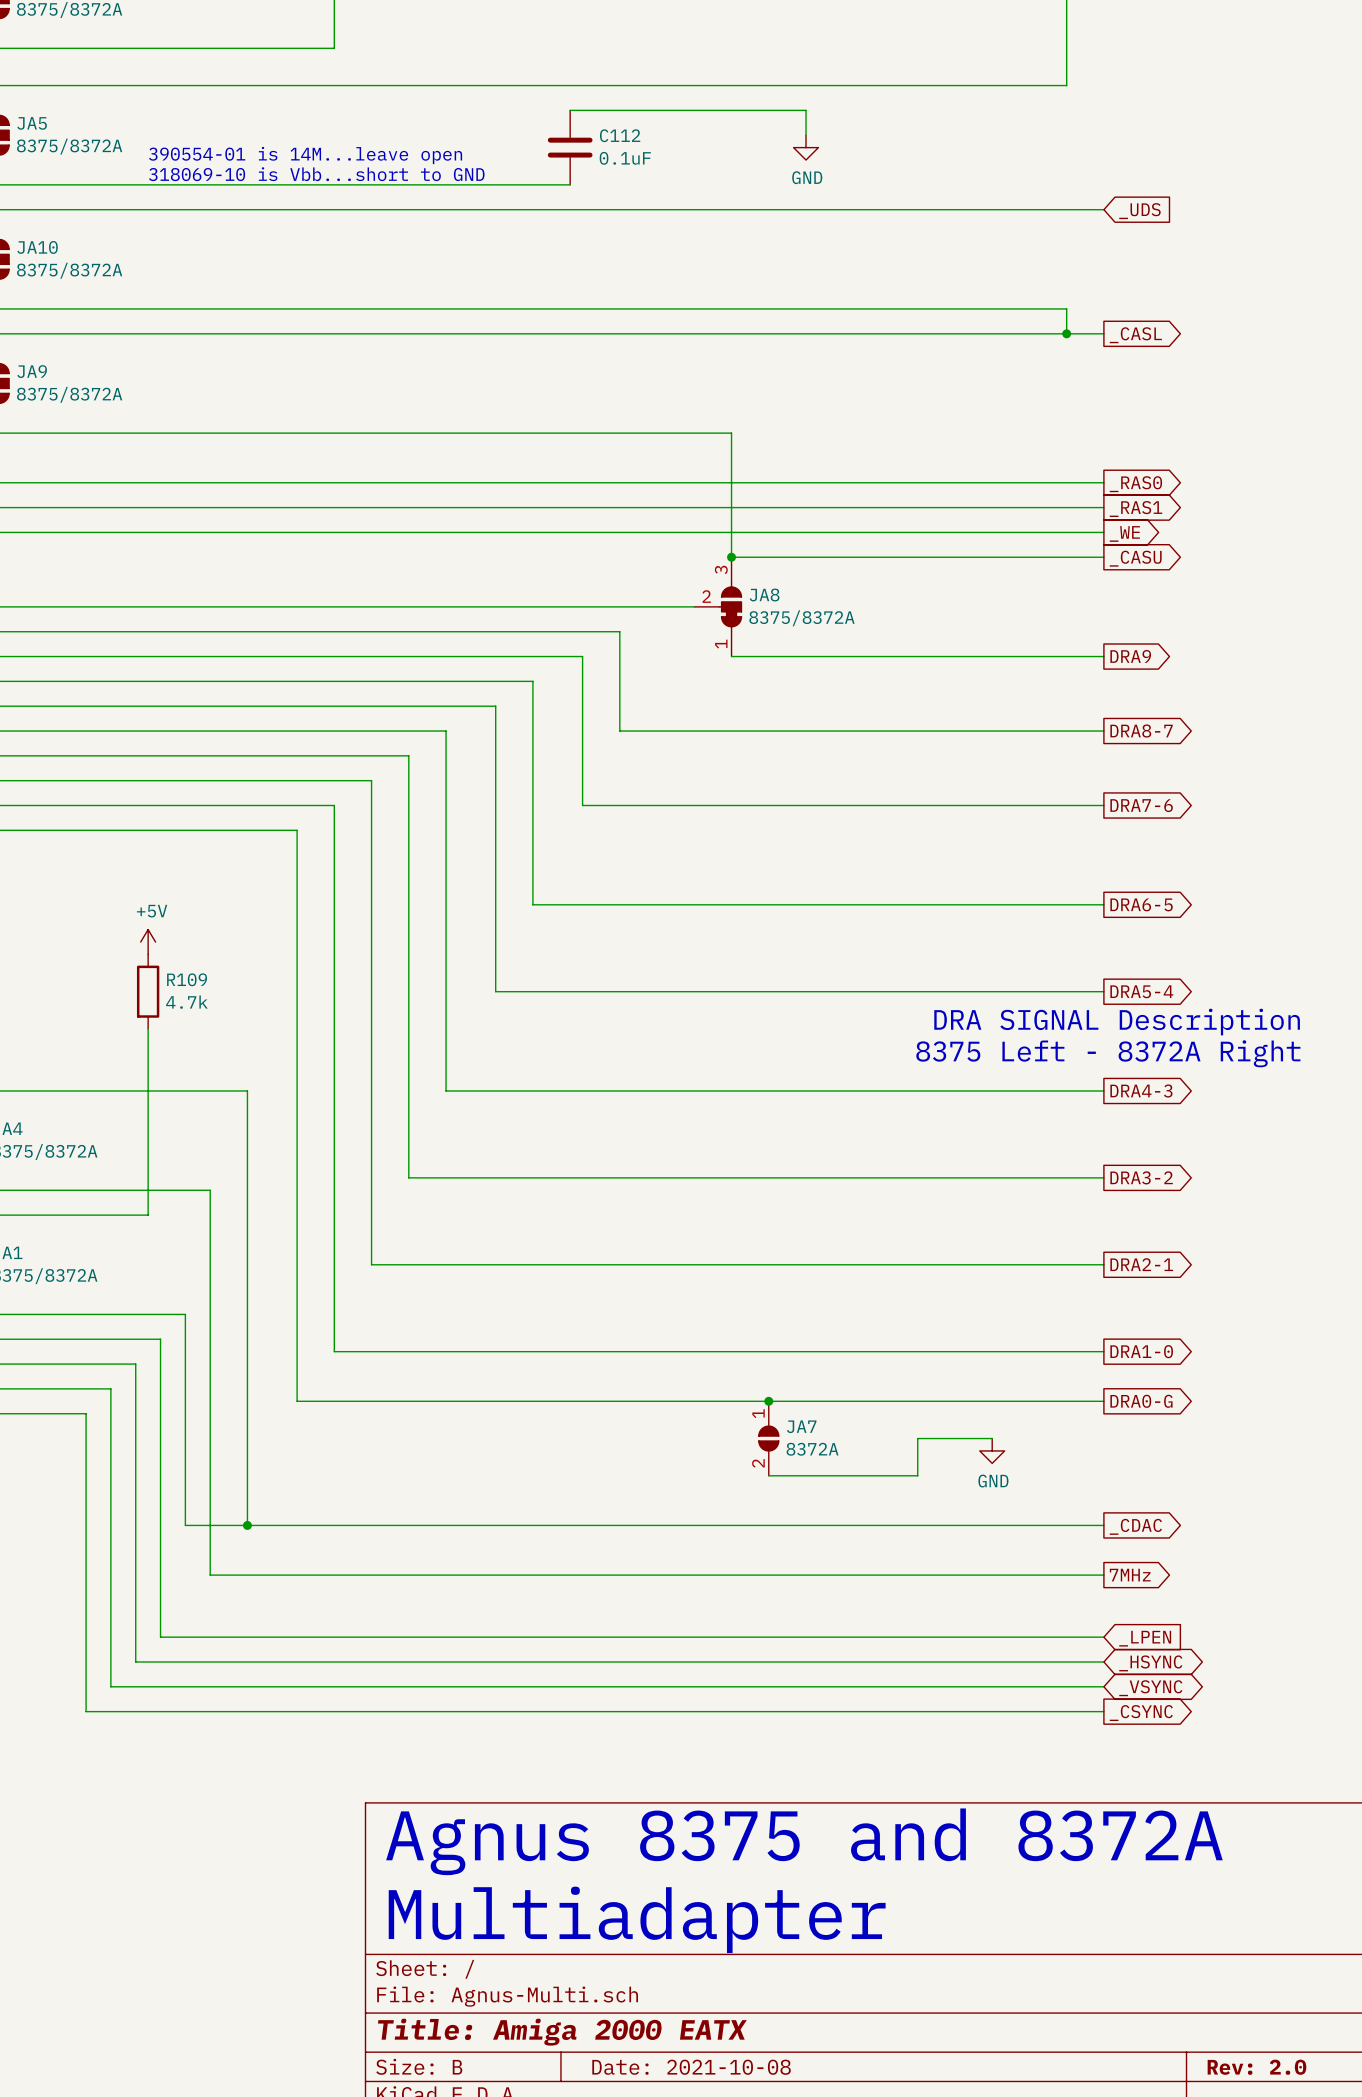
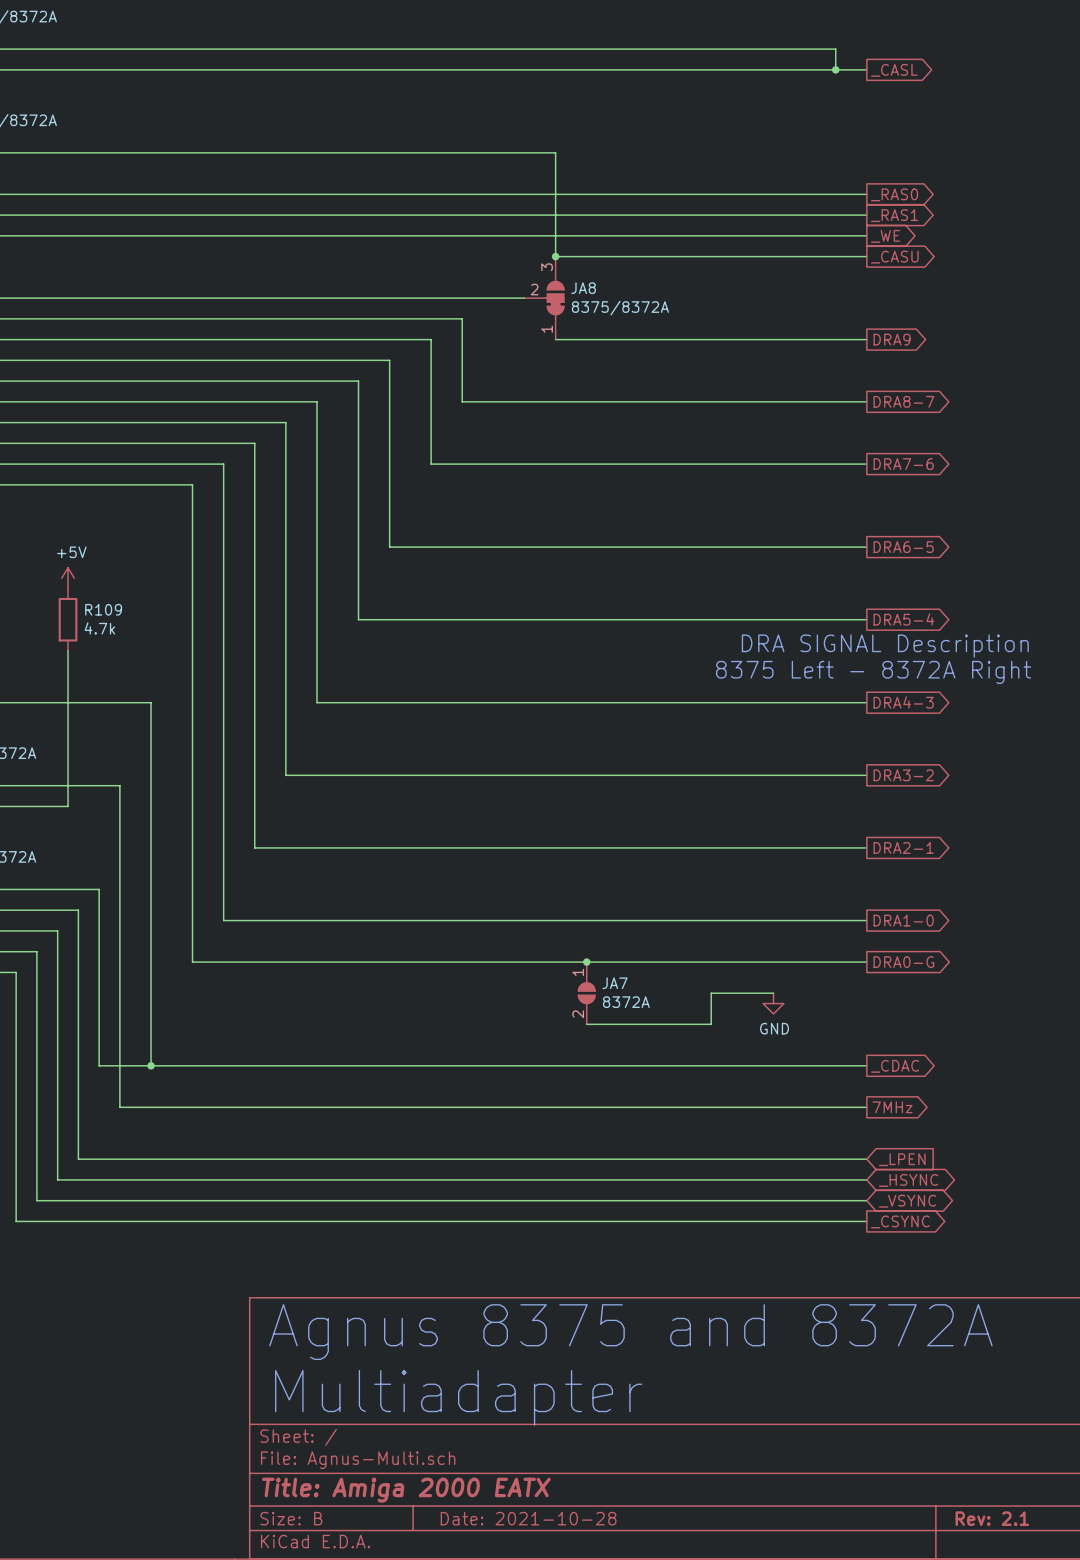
title block: Date: 2021-10-08 (691, 2067) -> Date: 2021-10-28 (528, 1518)
title block: Rev: 2.0 (1256, 2067) -> Rev: 2.1 (992, 1518)

